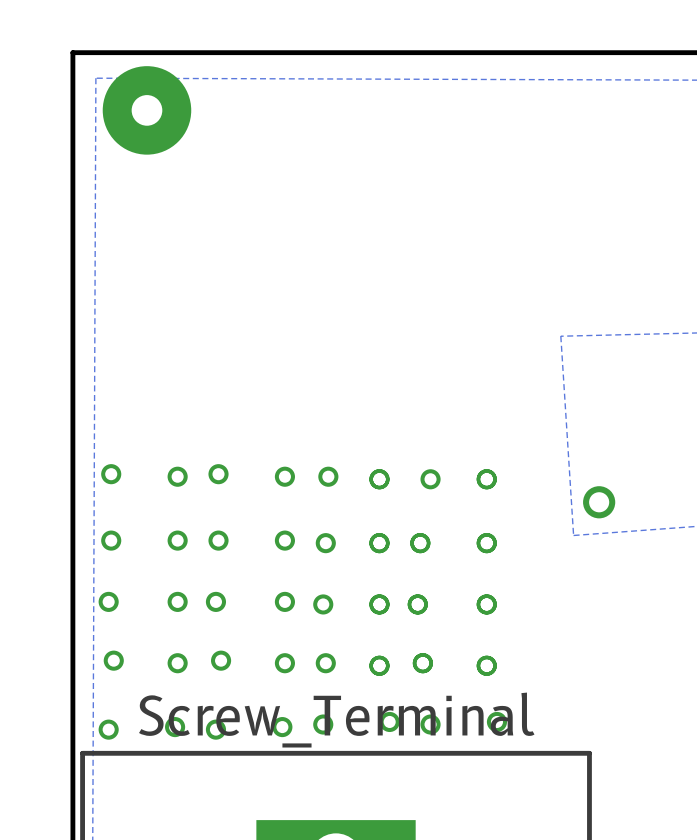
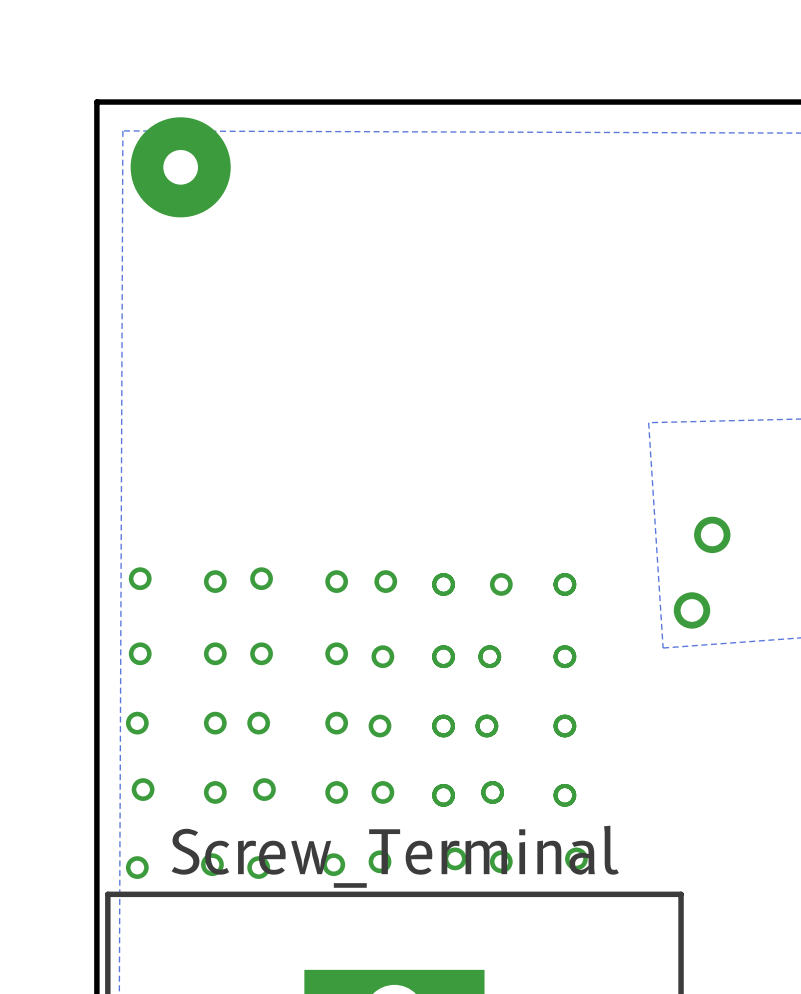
via: none -> (712, 534)

